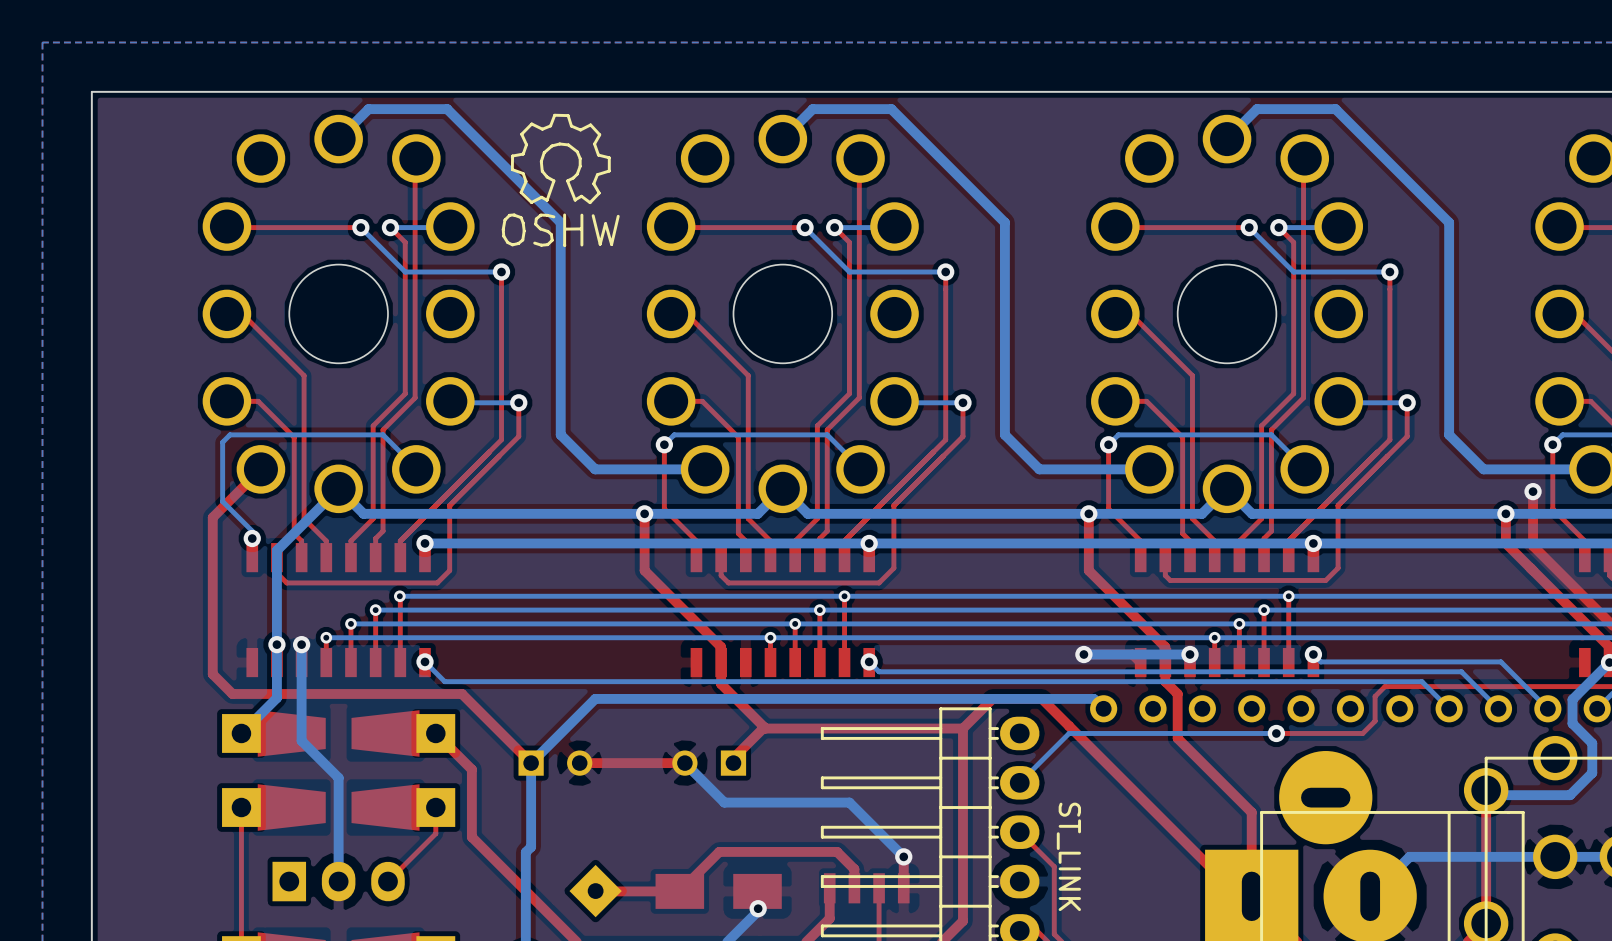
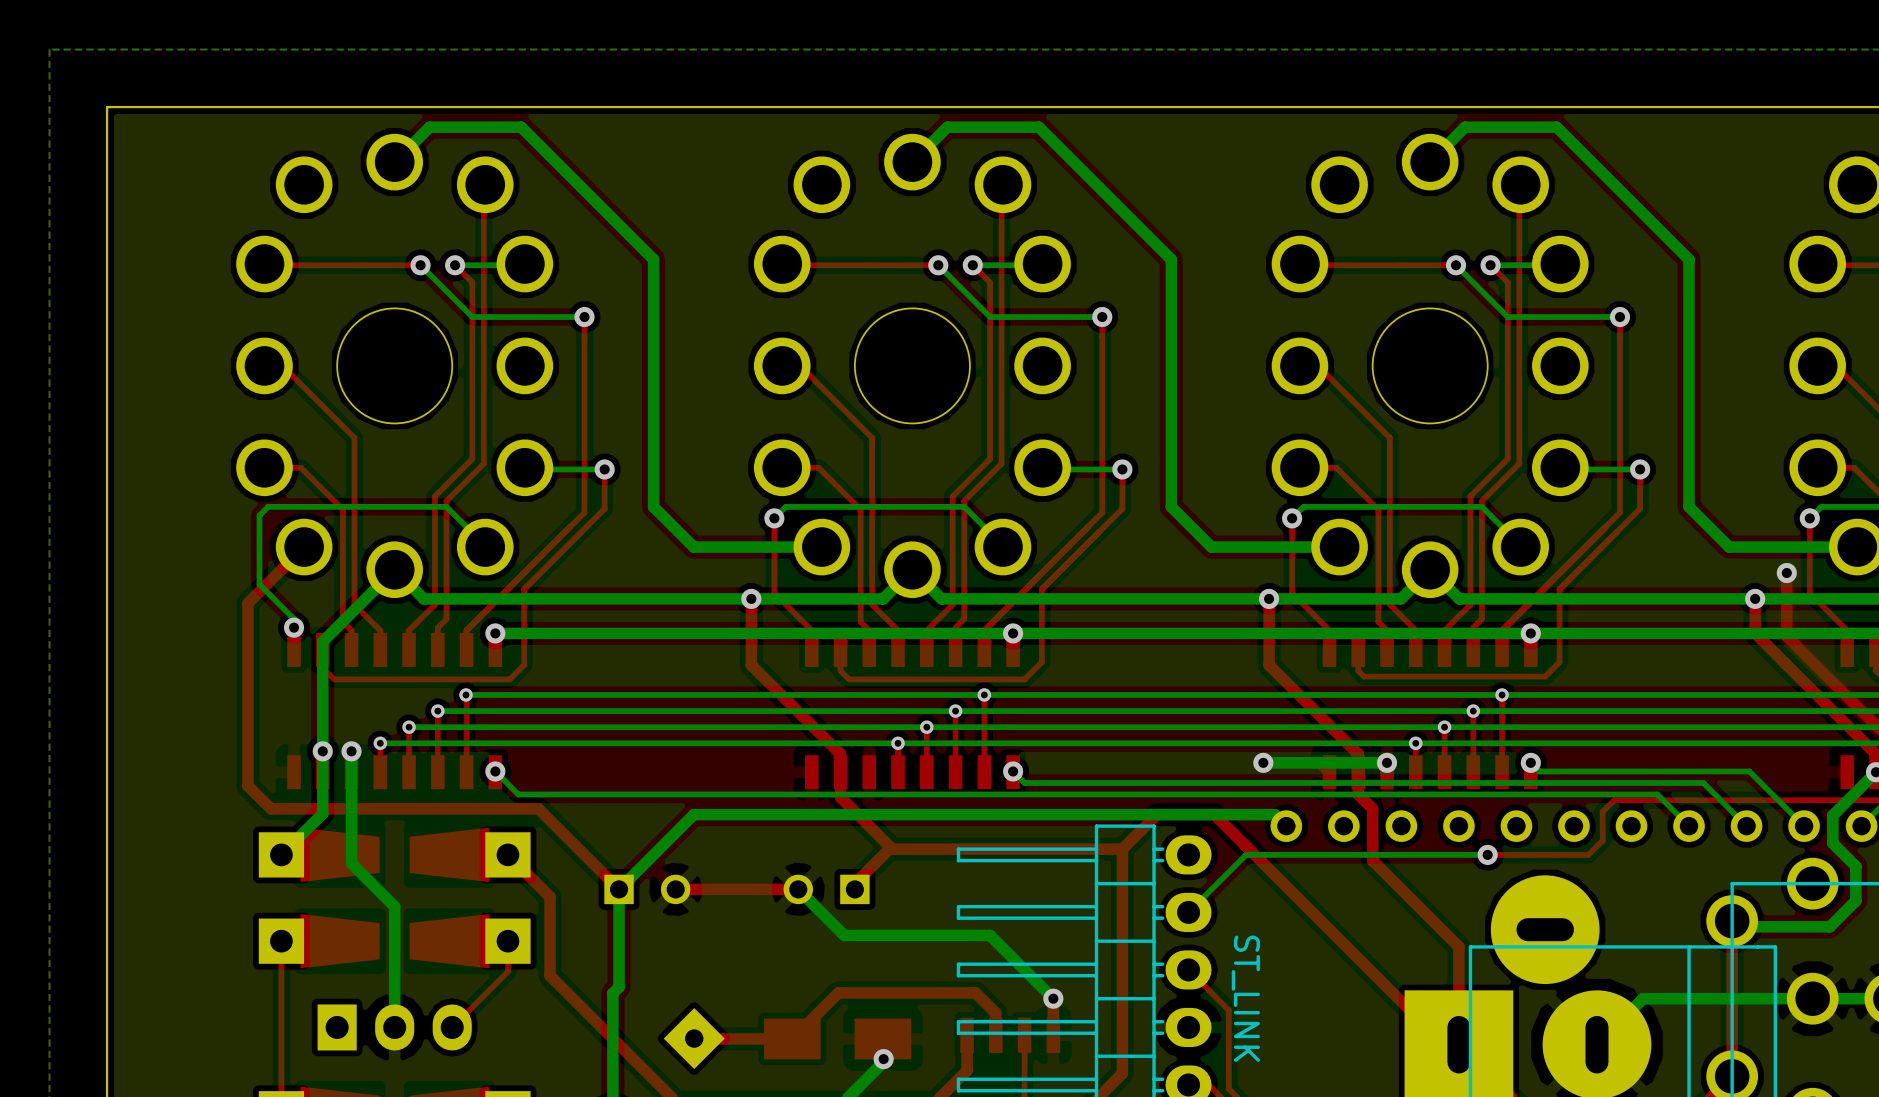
drawing: [501, 113, 620, 247] -> none

